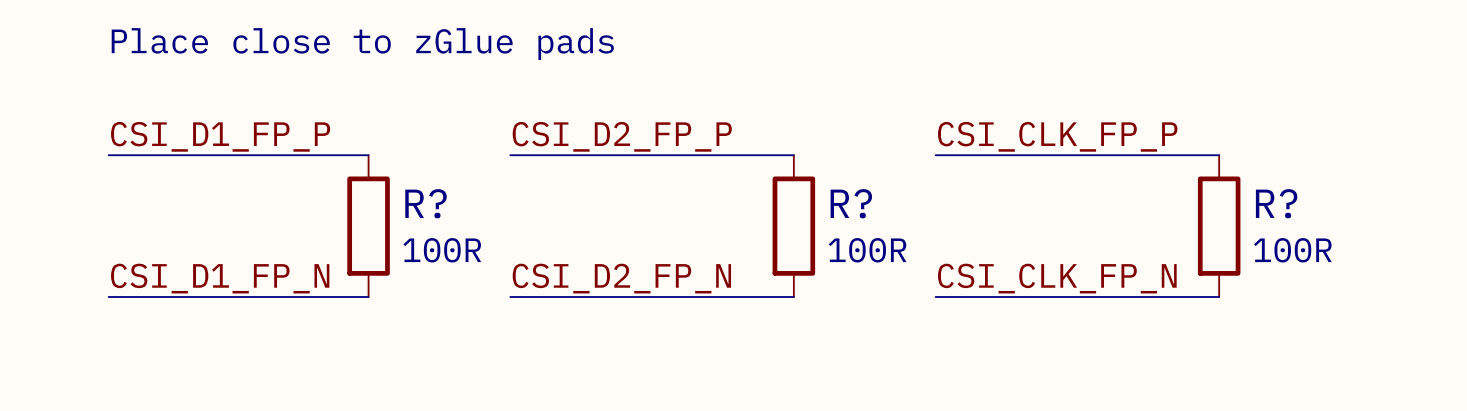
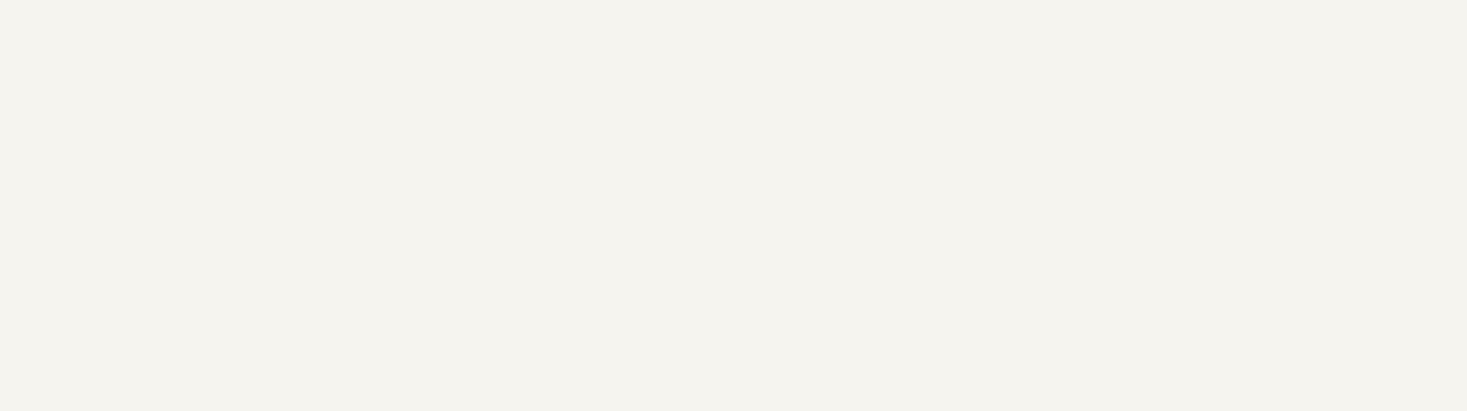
text: Place close to zGlue pads (362, 44) -> none
label: CSI_D1_FP_P (220, 136) -> none
label: CSI_D2_FP_P (622, 136) -> none
label: CSI_CLK_FP_P (1057, 136) -> none
wire: (108, 155) (368, 155) -> none
wire: (510, 155) (793, 155) -> none
wire: (935, 155) (1219, 155) -> none
R?: (368, 226) -> none
R?: (793, 226) -> none
R?: (1219, 226) -> none
label: CSI_D1_FP_N (220, 278) -> none
label: CSI_D2_FP_N (621, 278) -> none
label: CSI_CLK_FP_N (1057, 278) -> none
wire: (108, 297) (368, 297) -> none
wire: (510, 297) (793, 297) -> none
wire: (935, 297) (1219, 297) -> none

